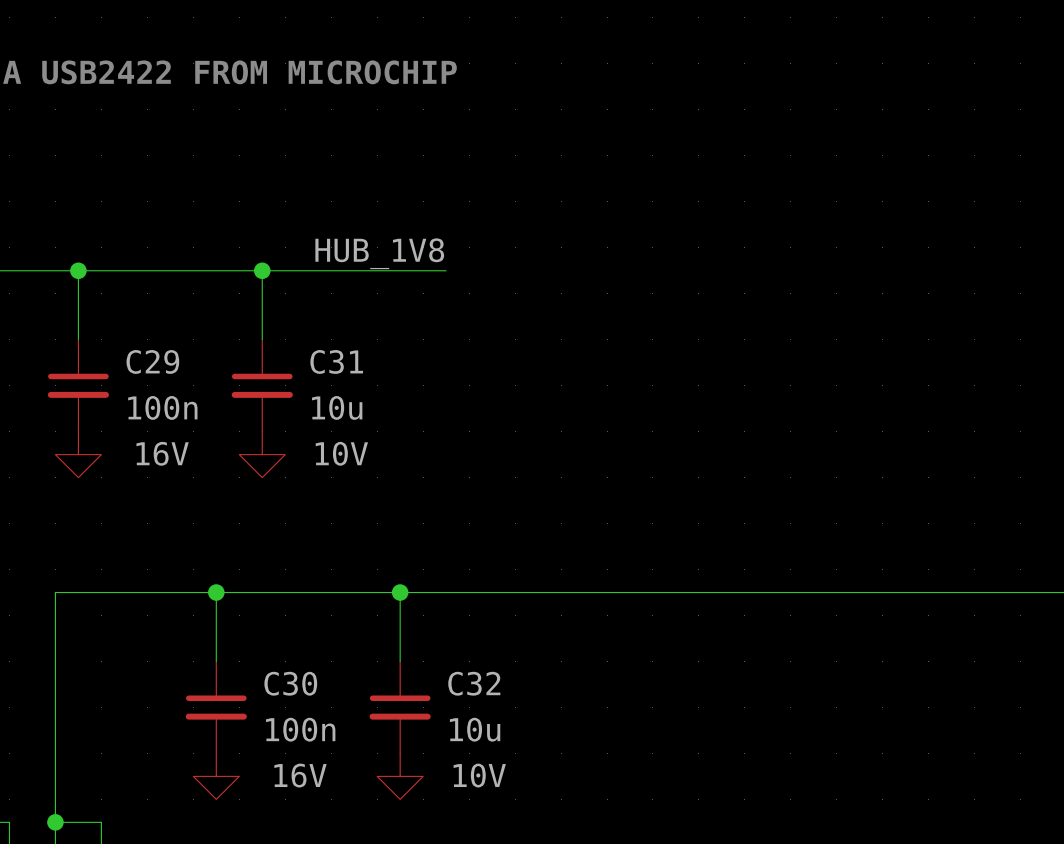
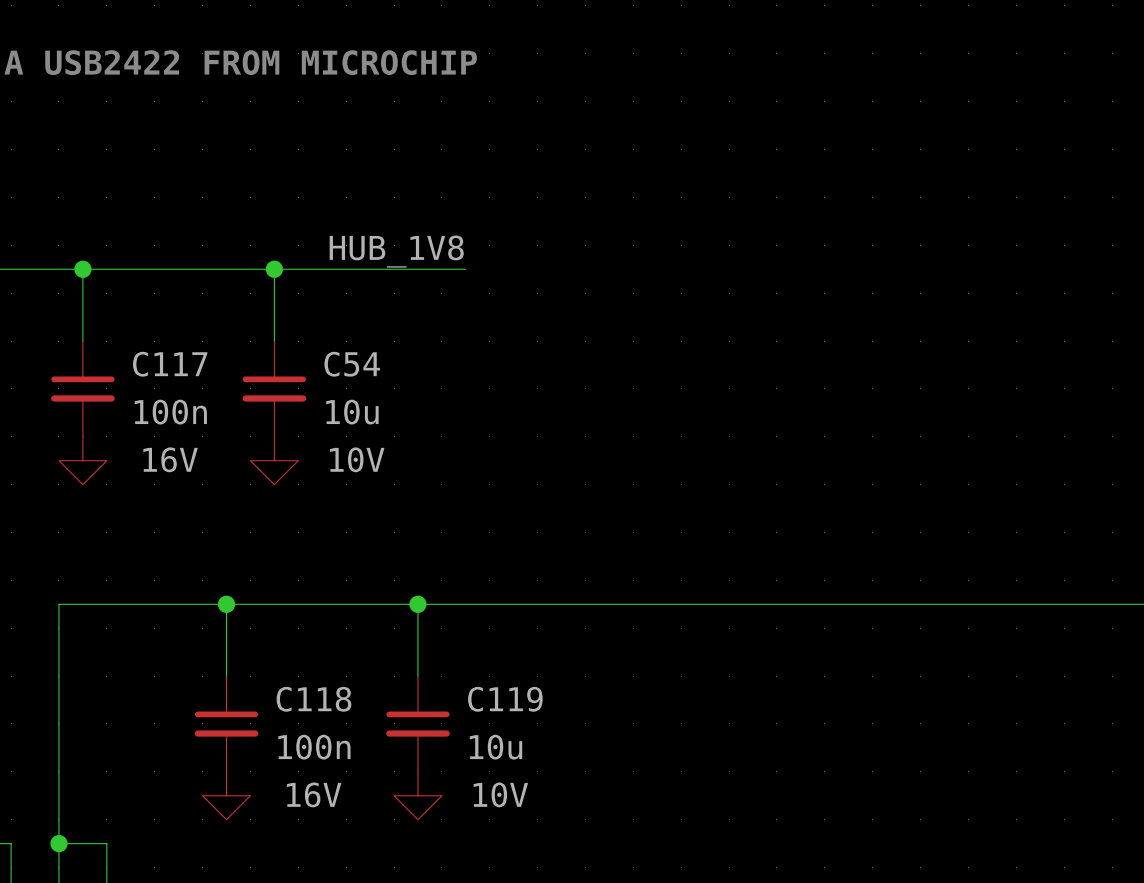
C29 name: C29 (152, 361) -> C117 (170, 364)
C31 name: C31 (336, 361) -> C54 (352, 364)
C30 name: C30 (290, 683) -> C118 (313, 699)
C32 name: C32 (474, 683) -> C119 (505, 699)

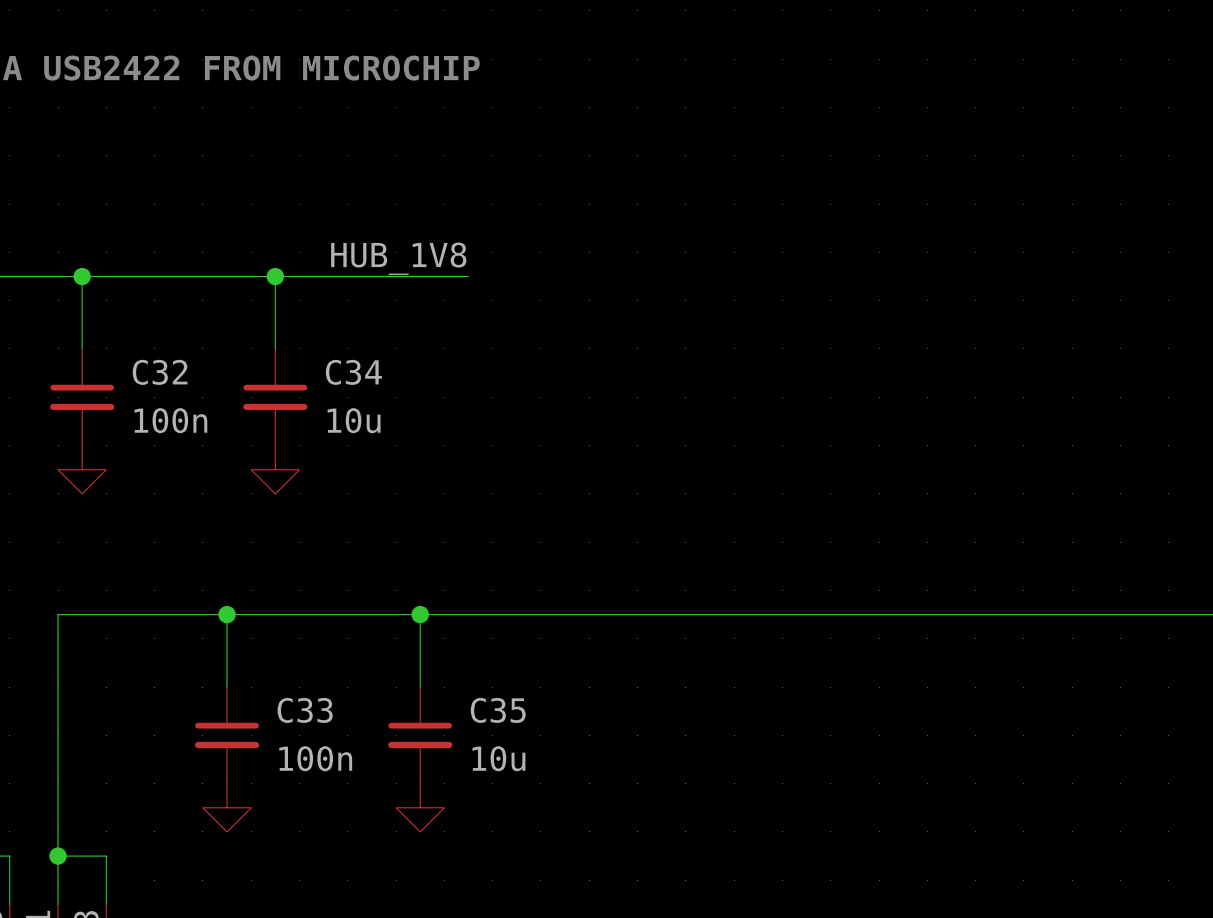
C117 name: C117 (170, 364) -> C32 (160, 372)
C54 name: C54 (352, 364) -> C34 (353, 372)
C117 text: 16V (170, 459) -> none
C54 text: 10V (357, 459) -> none
C118 name: C118 (313, 699) -> C33 (305, 710)
C119 name: C119 (505, 699) -> C35 (498, 710)
C118 text: 16V (314, 794) -> none
C119 text: 10V (500, 794) -> none

